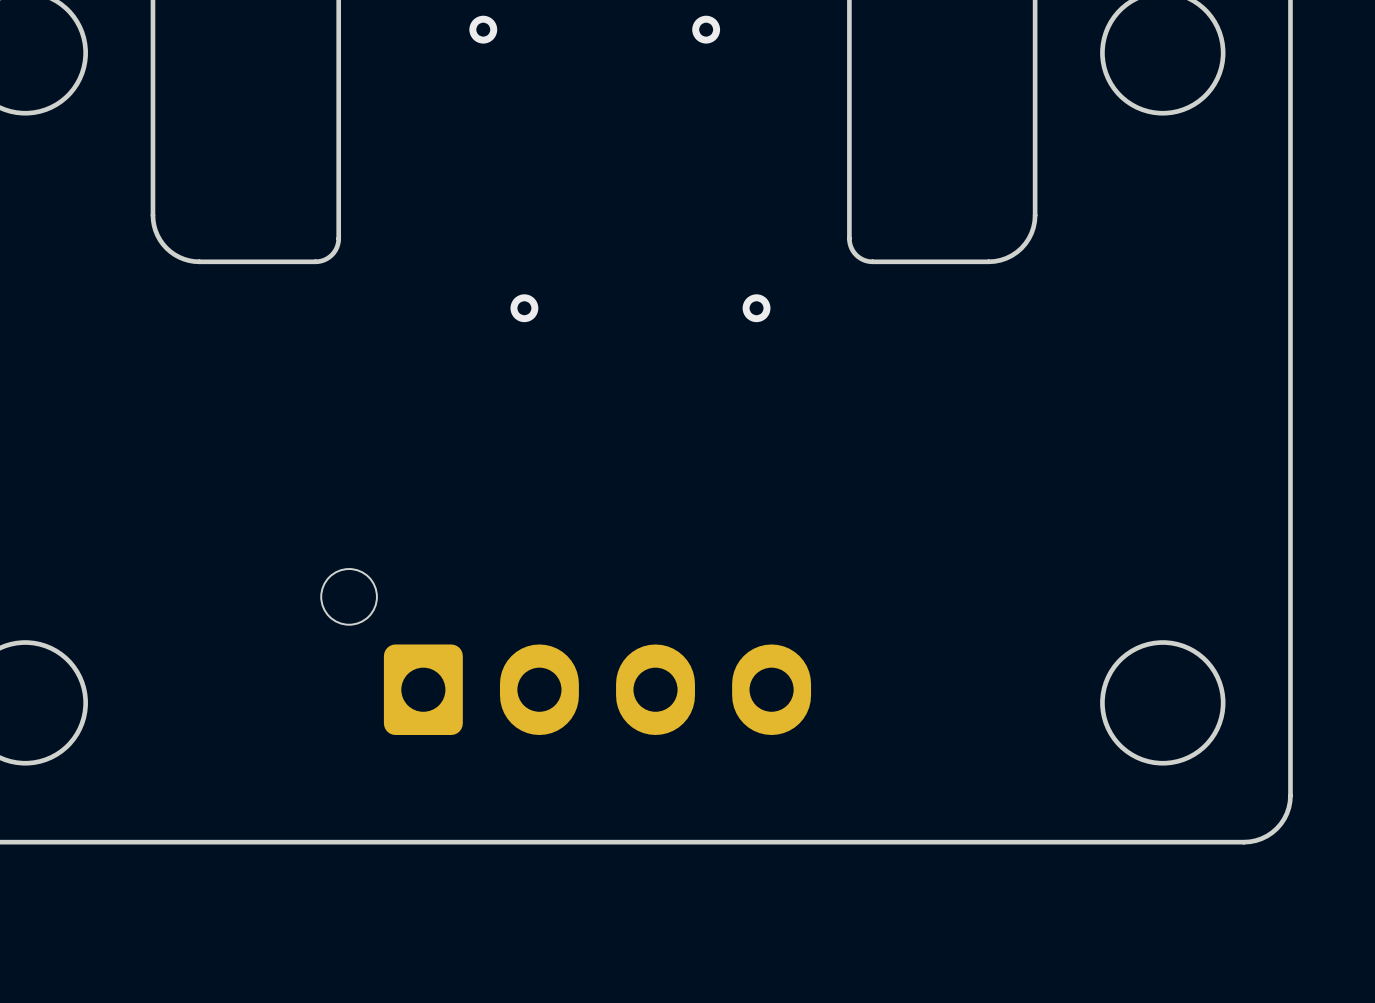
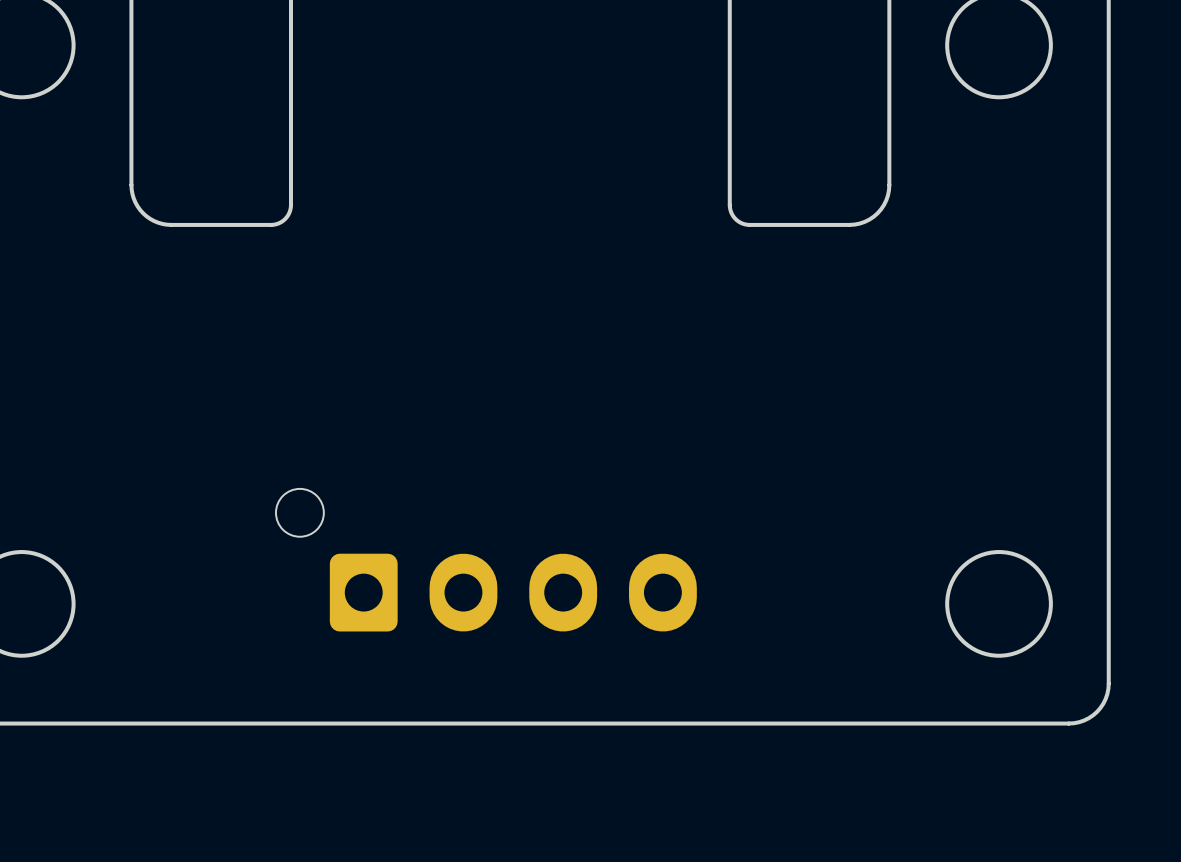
via: (483, 29) -> none
via: (706, 29) -> none
via: (524, 308) -> none
via: (756, 308) -> none

